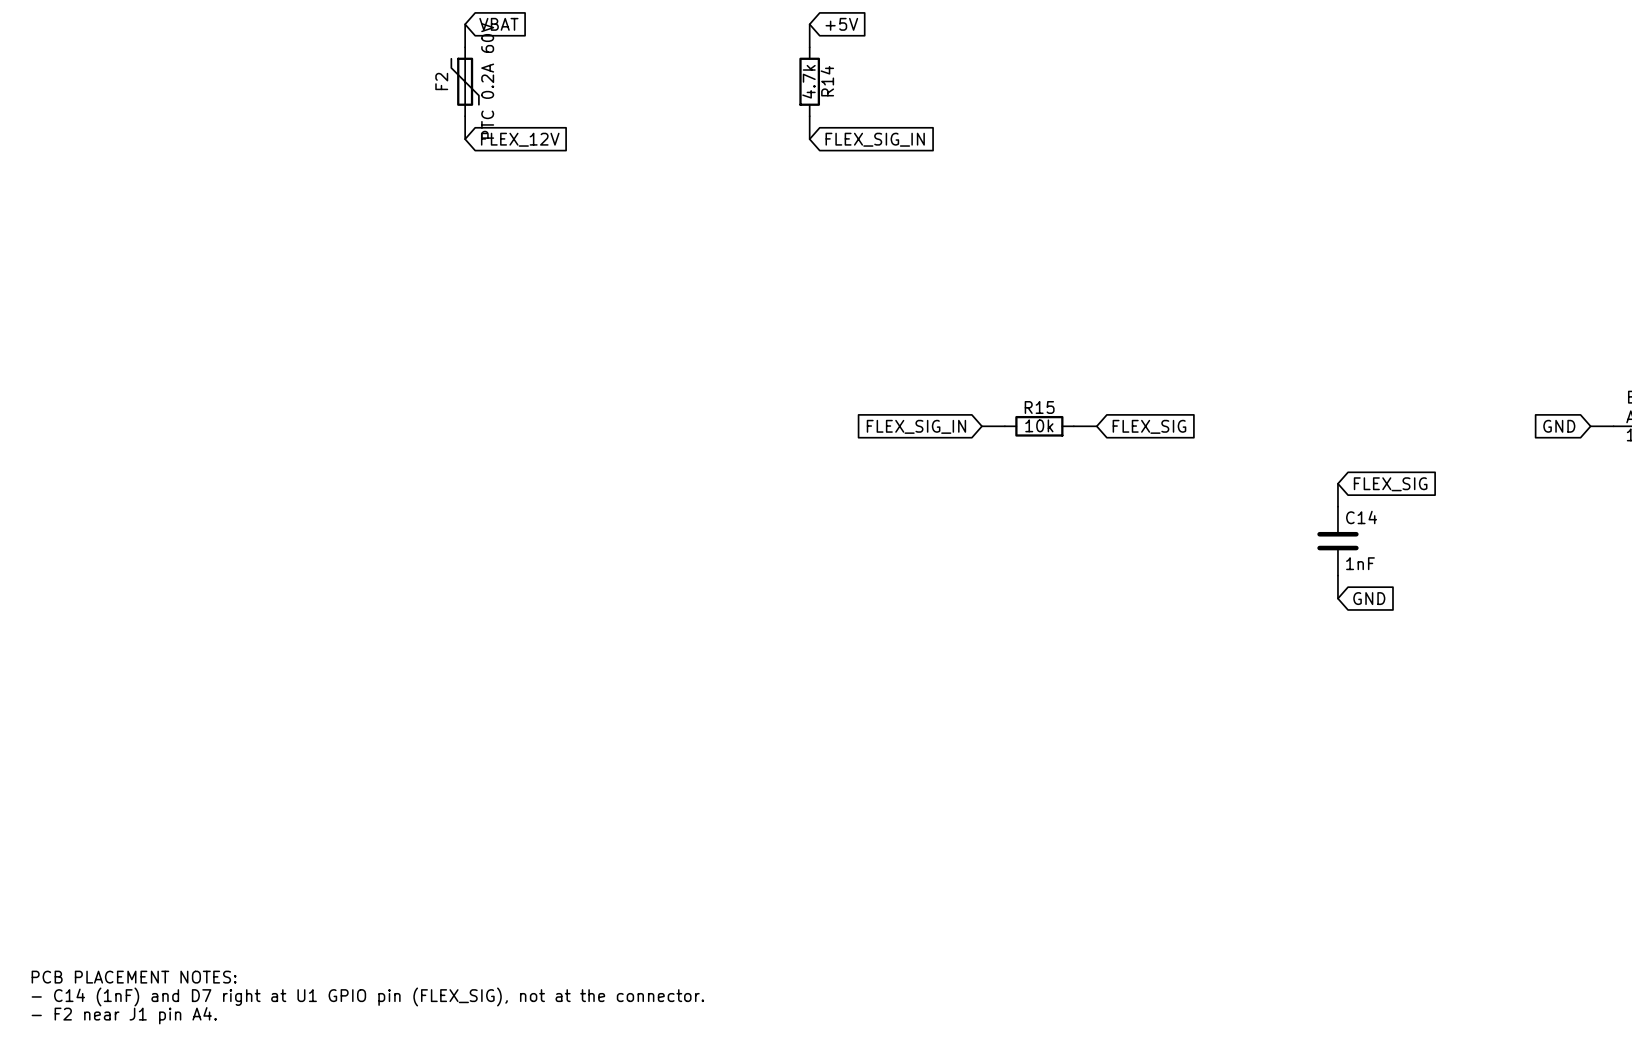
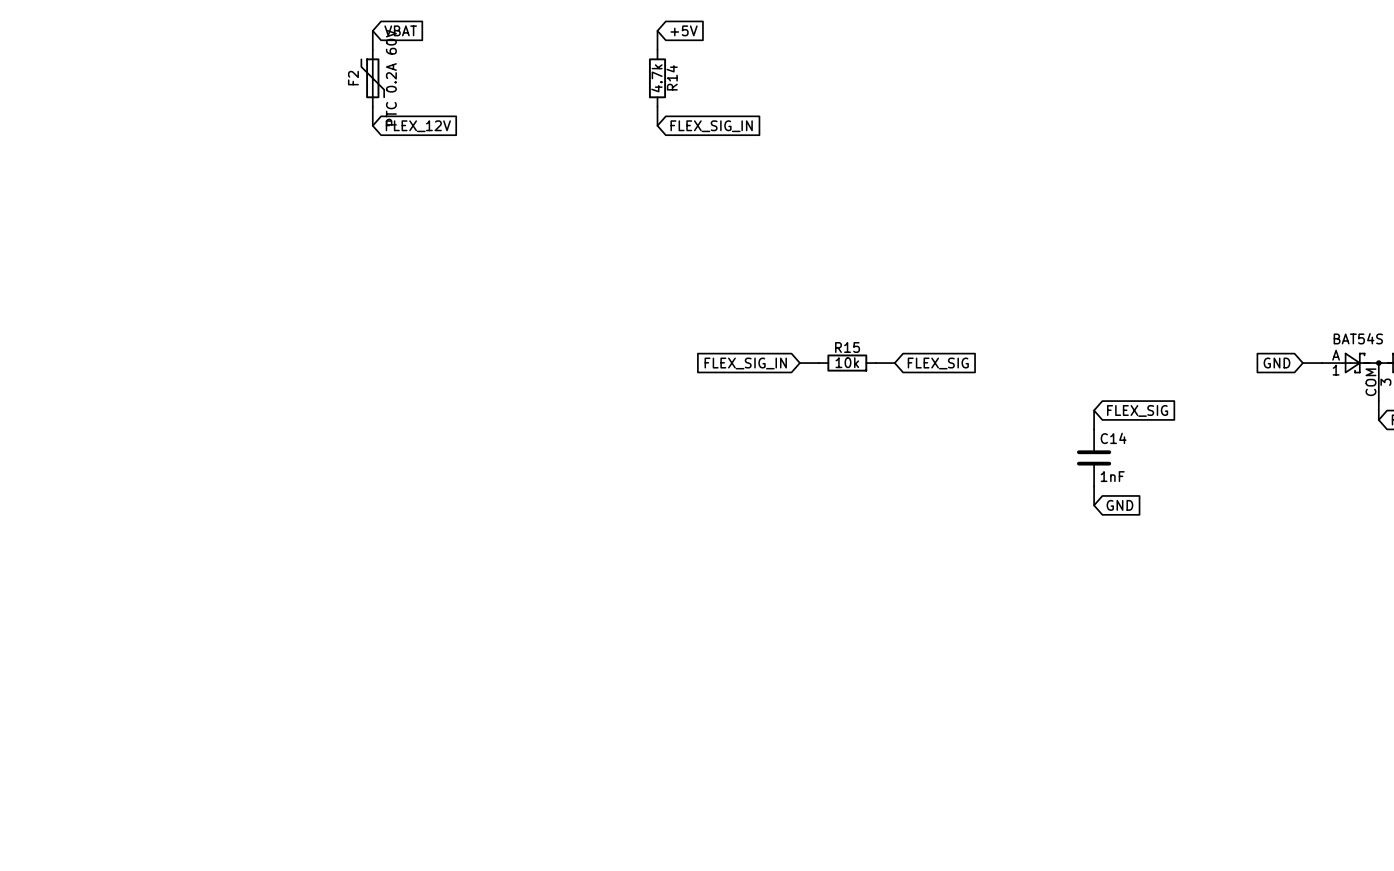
text: PCB PLACEMENT NOTES: (134, 977) -> none
text: - C14 (1nF) and D7 right at U1 GPIO pin (FLEX_SIG), not at the connector. (367, 996) -> none
text: - F2 near J1 pin A4. (124, 1015) -> none

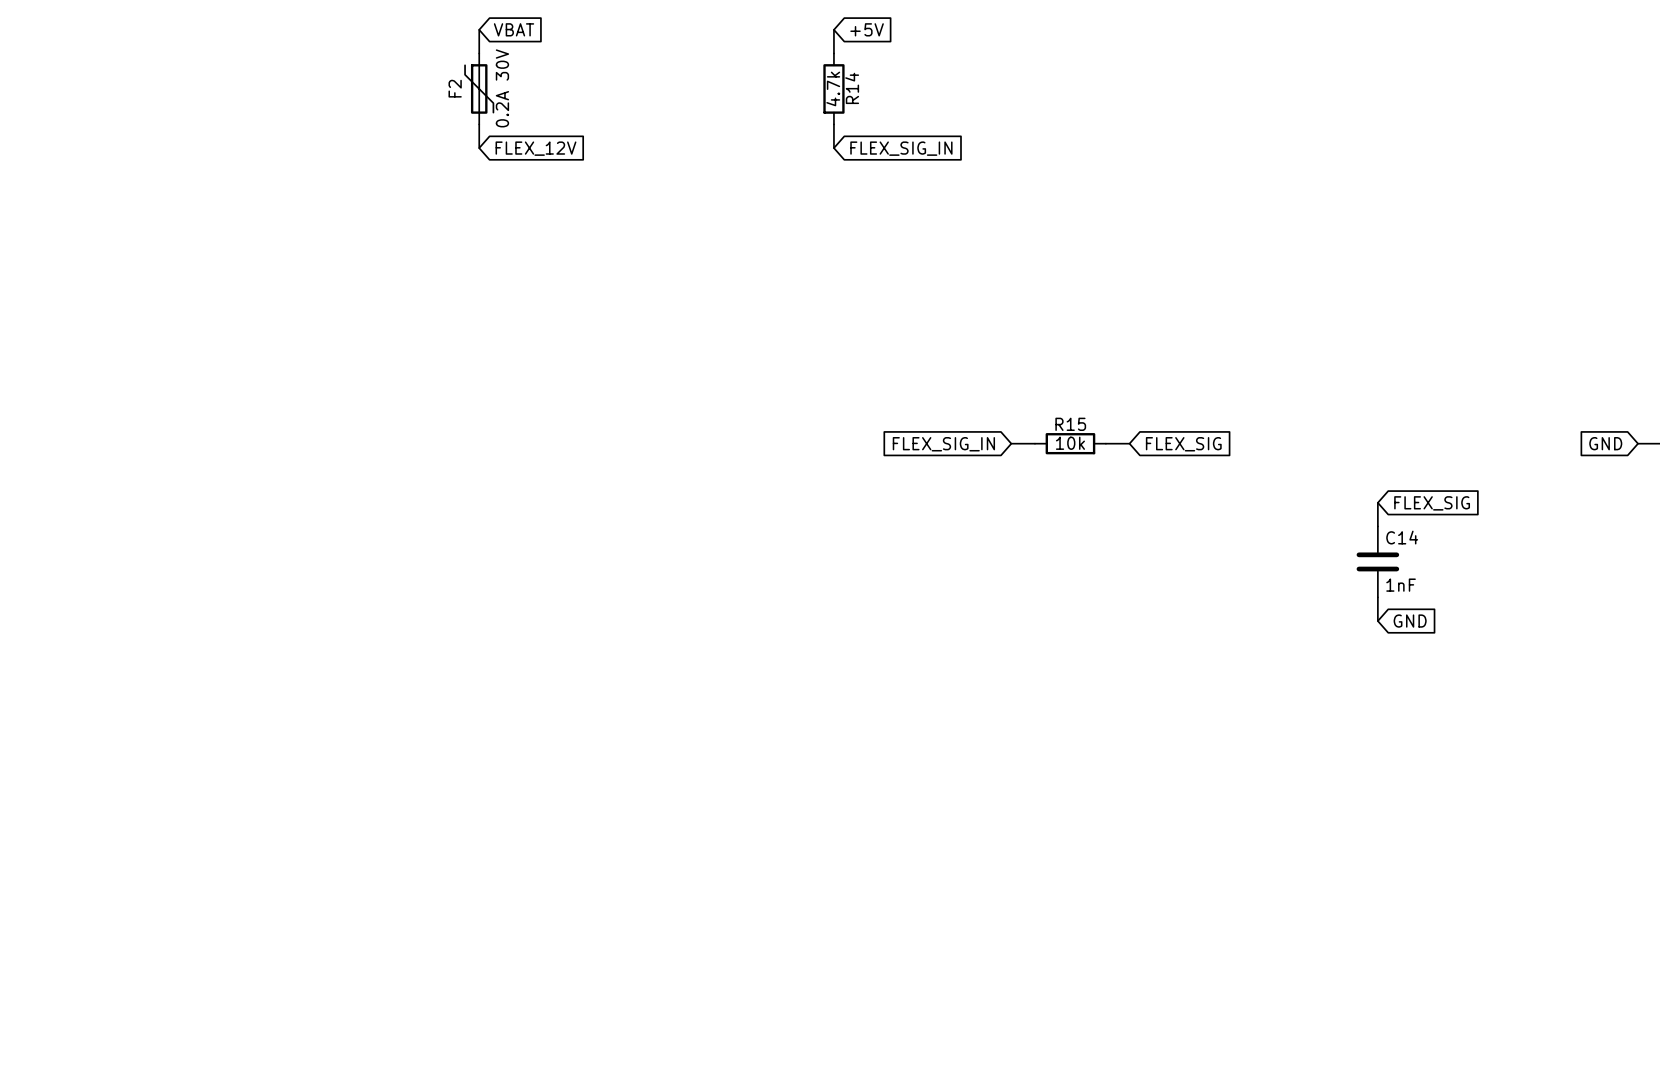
F2 value: PTC 0.2A 60V (391, 77) -> 0.2A 30V (502, 88)

